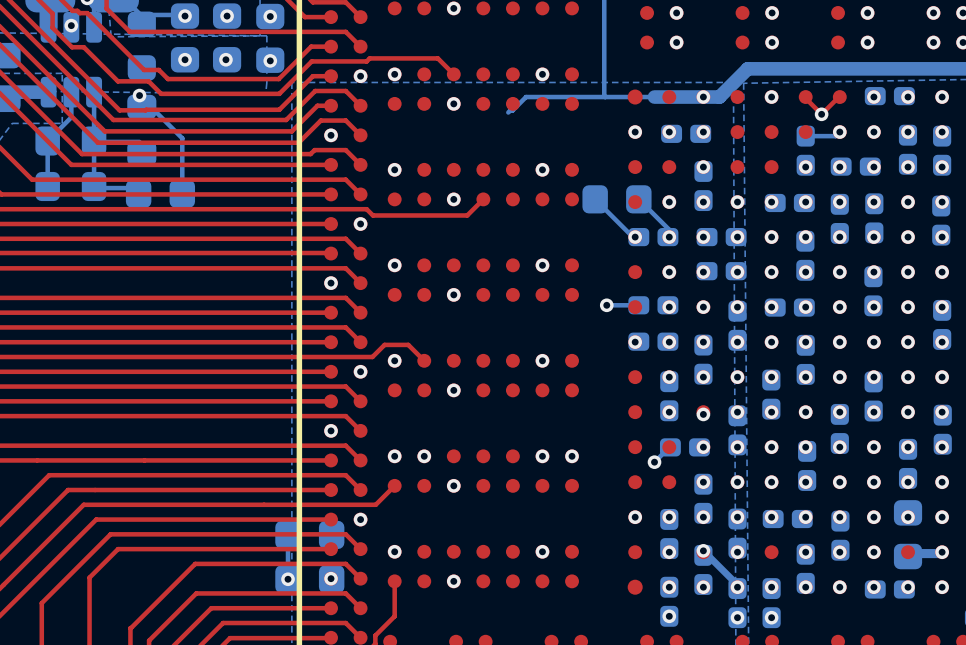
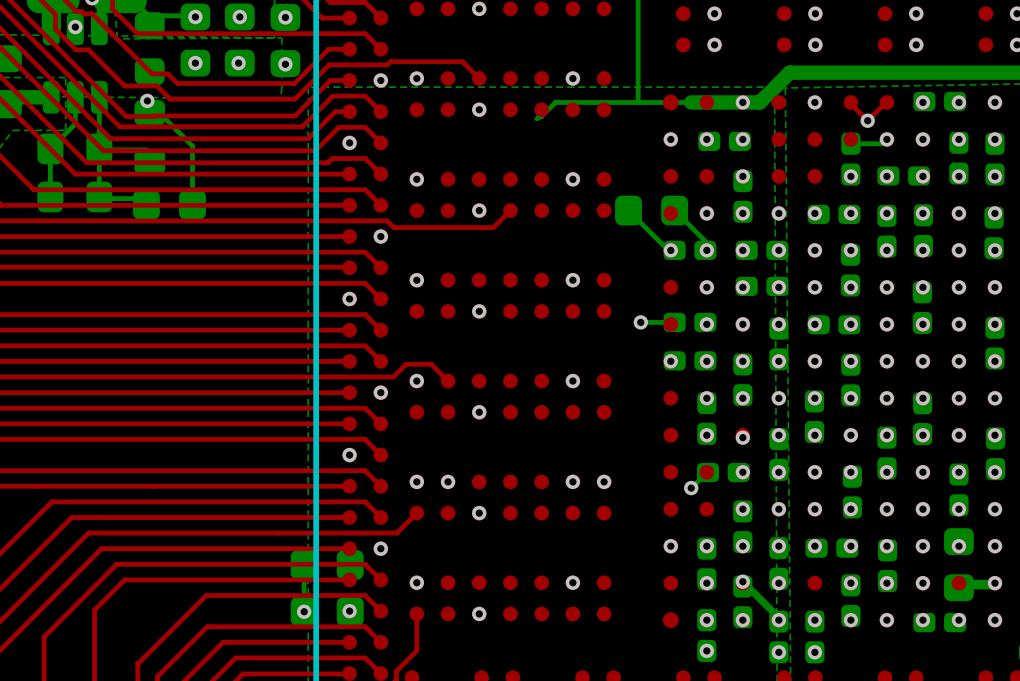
via: (933, 12) -> none
via: (933, 42) -> none

